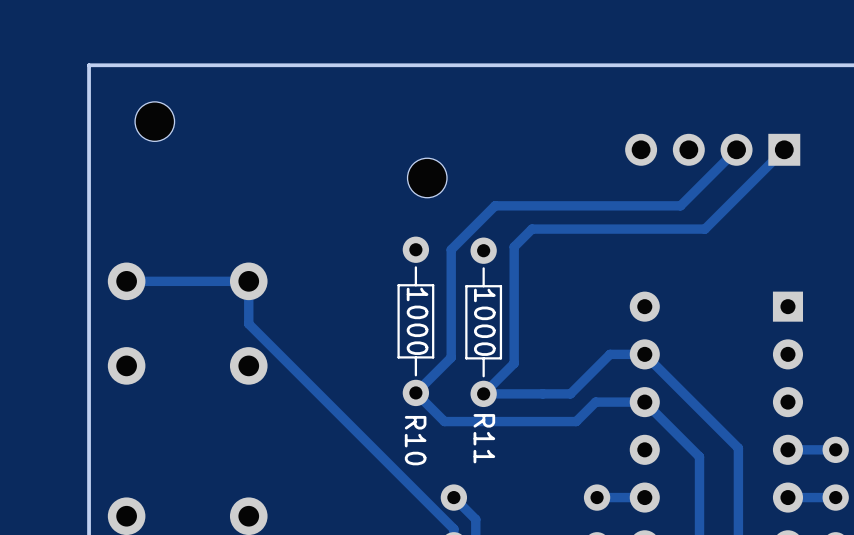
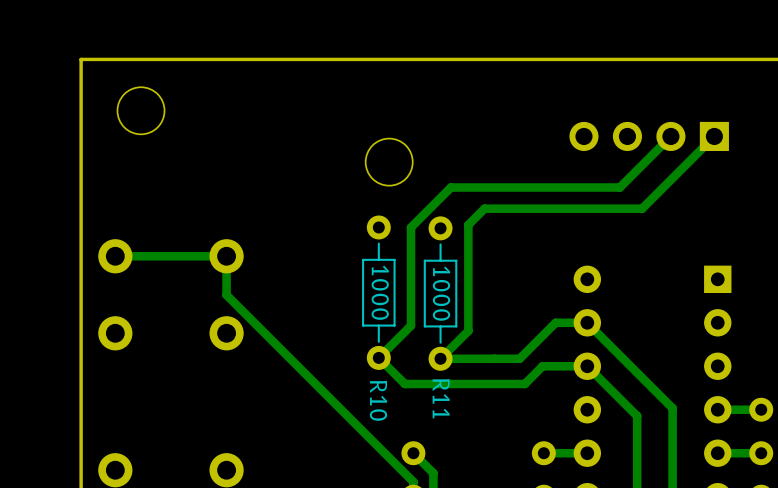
round board edge: none -> [116, 86, 166, 136]
part: (154, 121) -> none
round board edge: none -> [364, 137, 414, 187]
part: (427, 177) -> none

